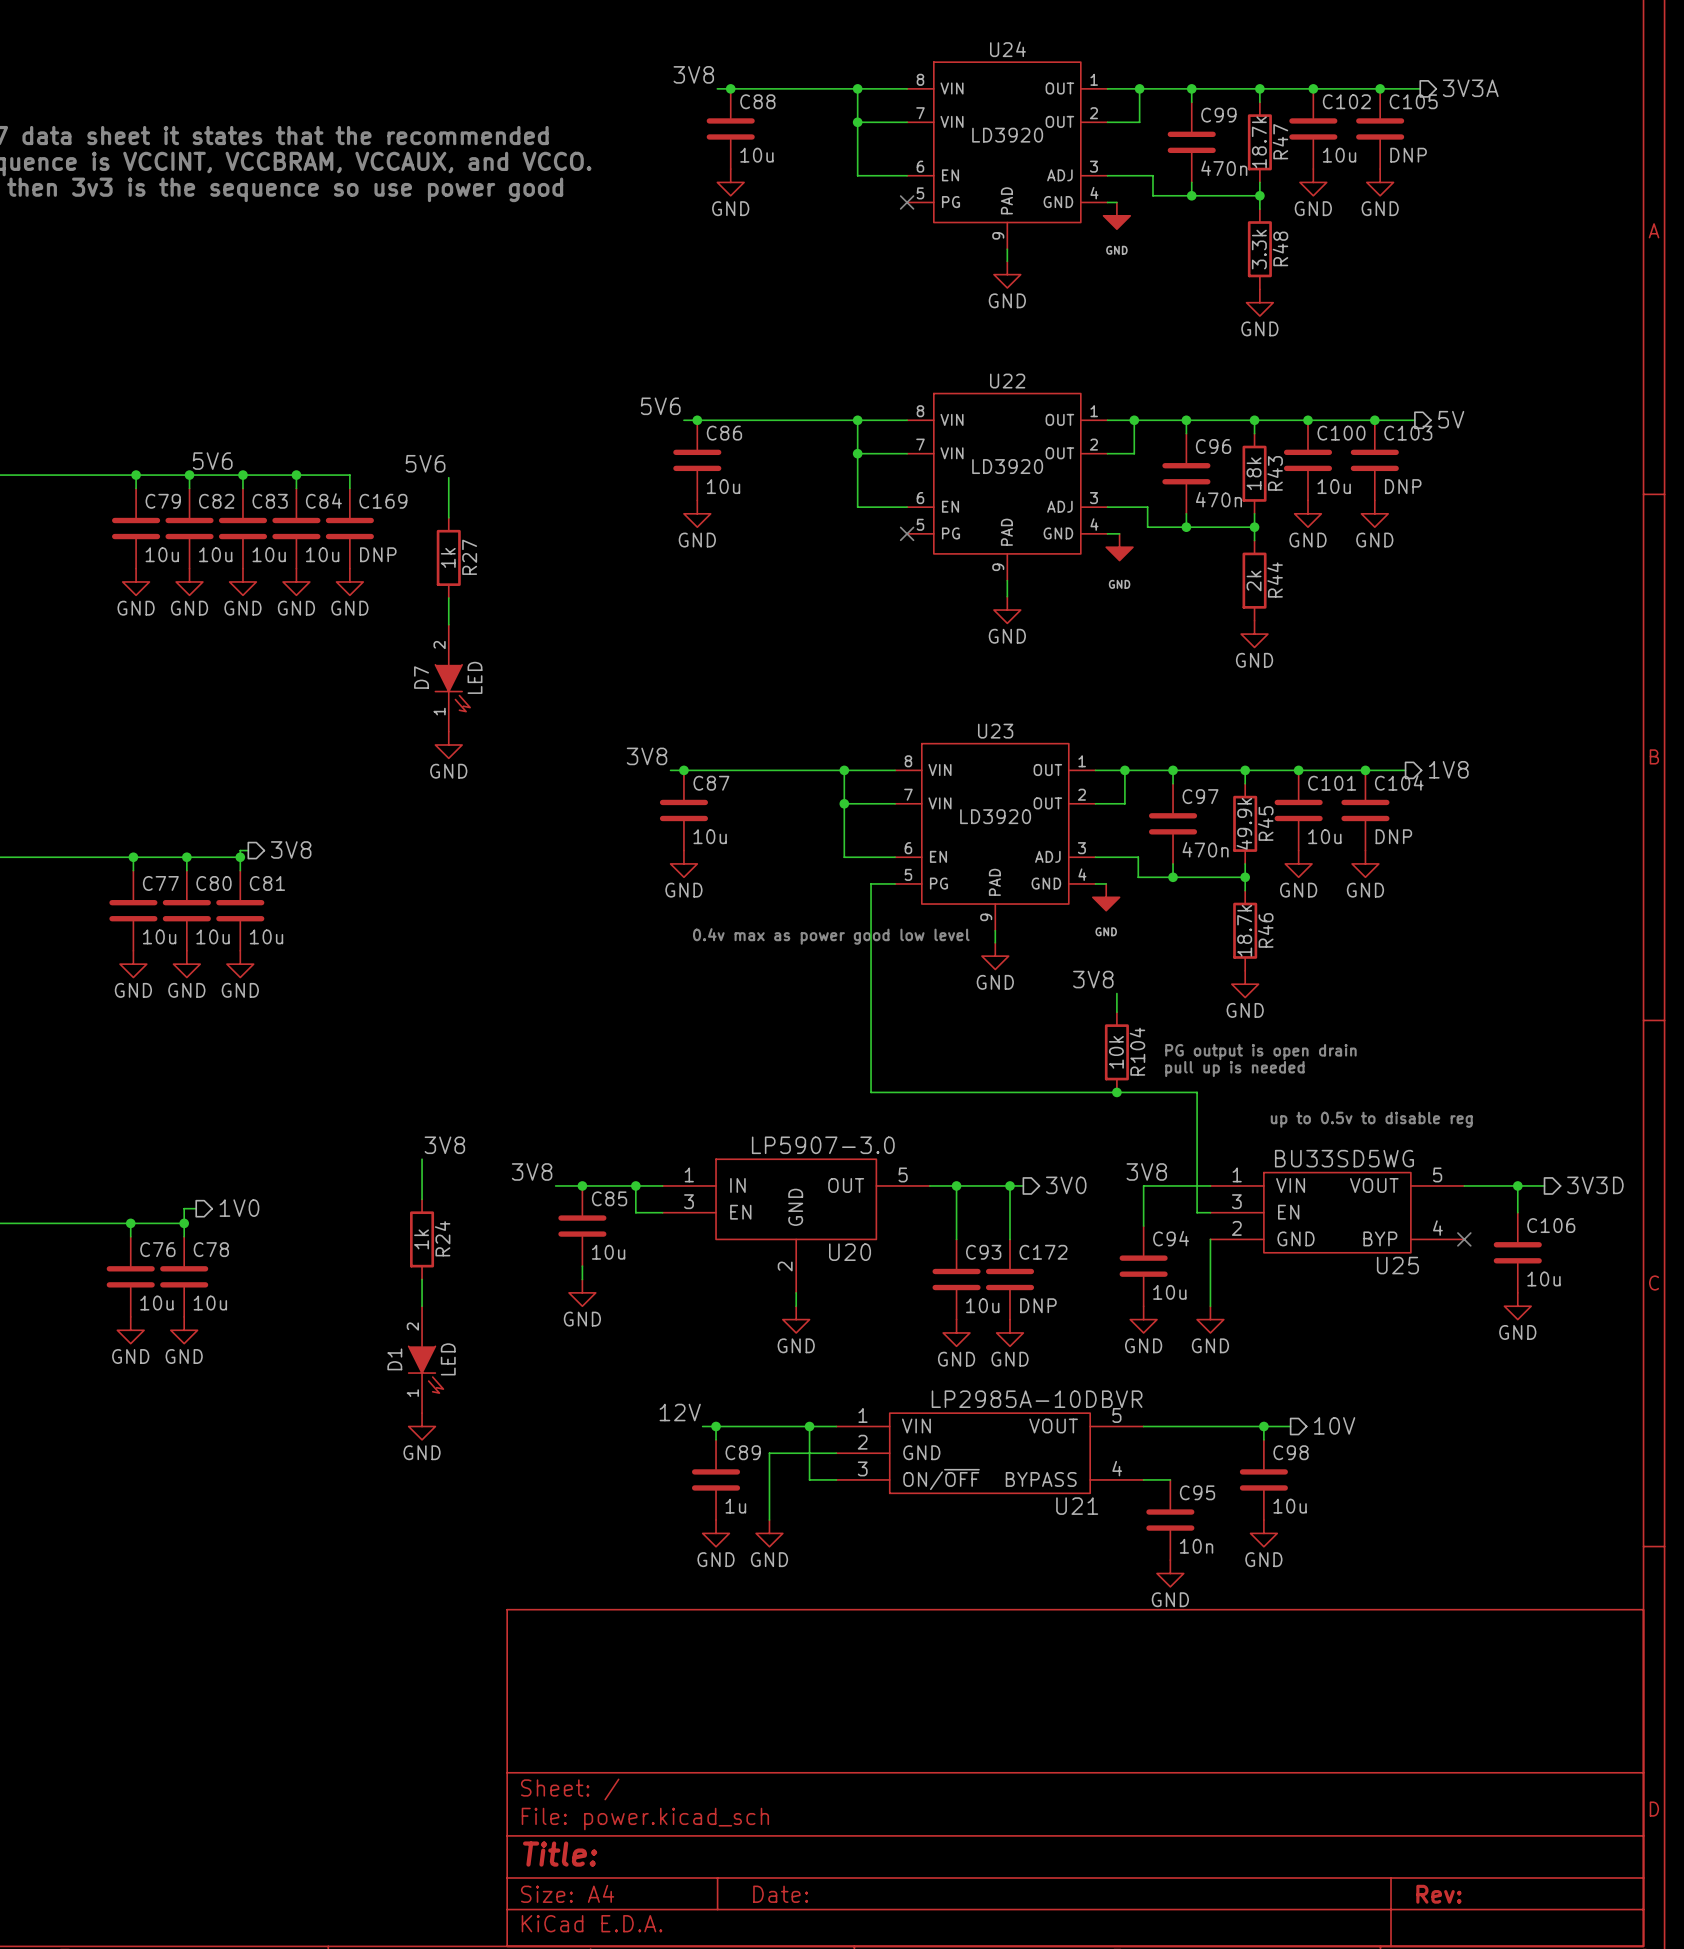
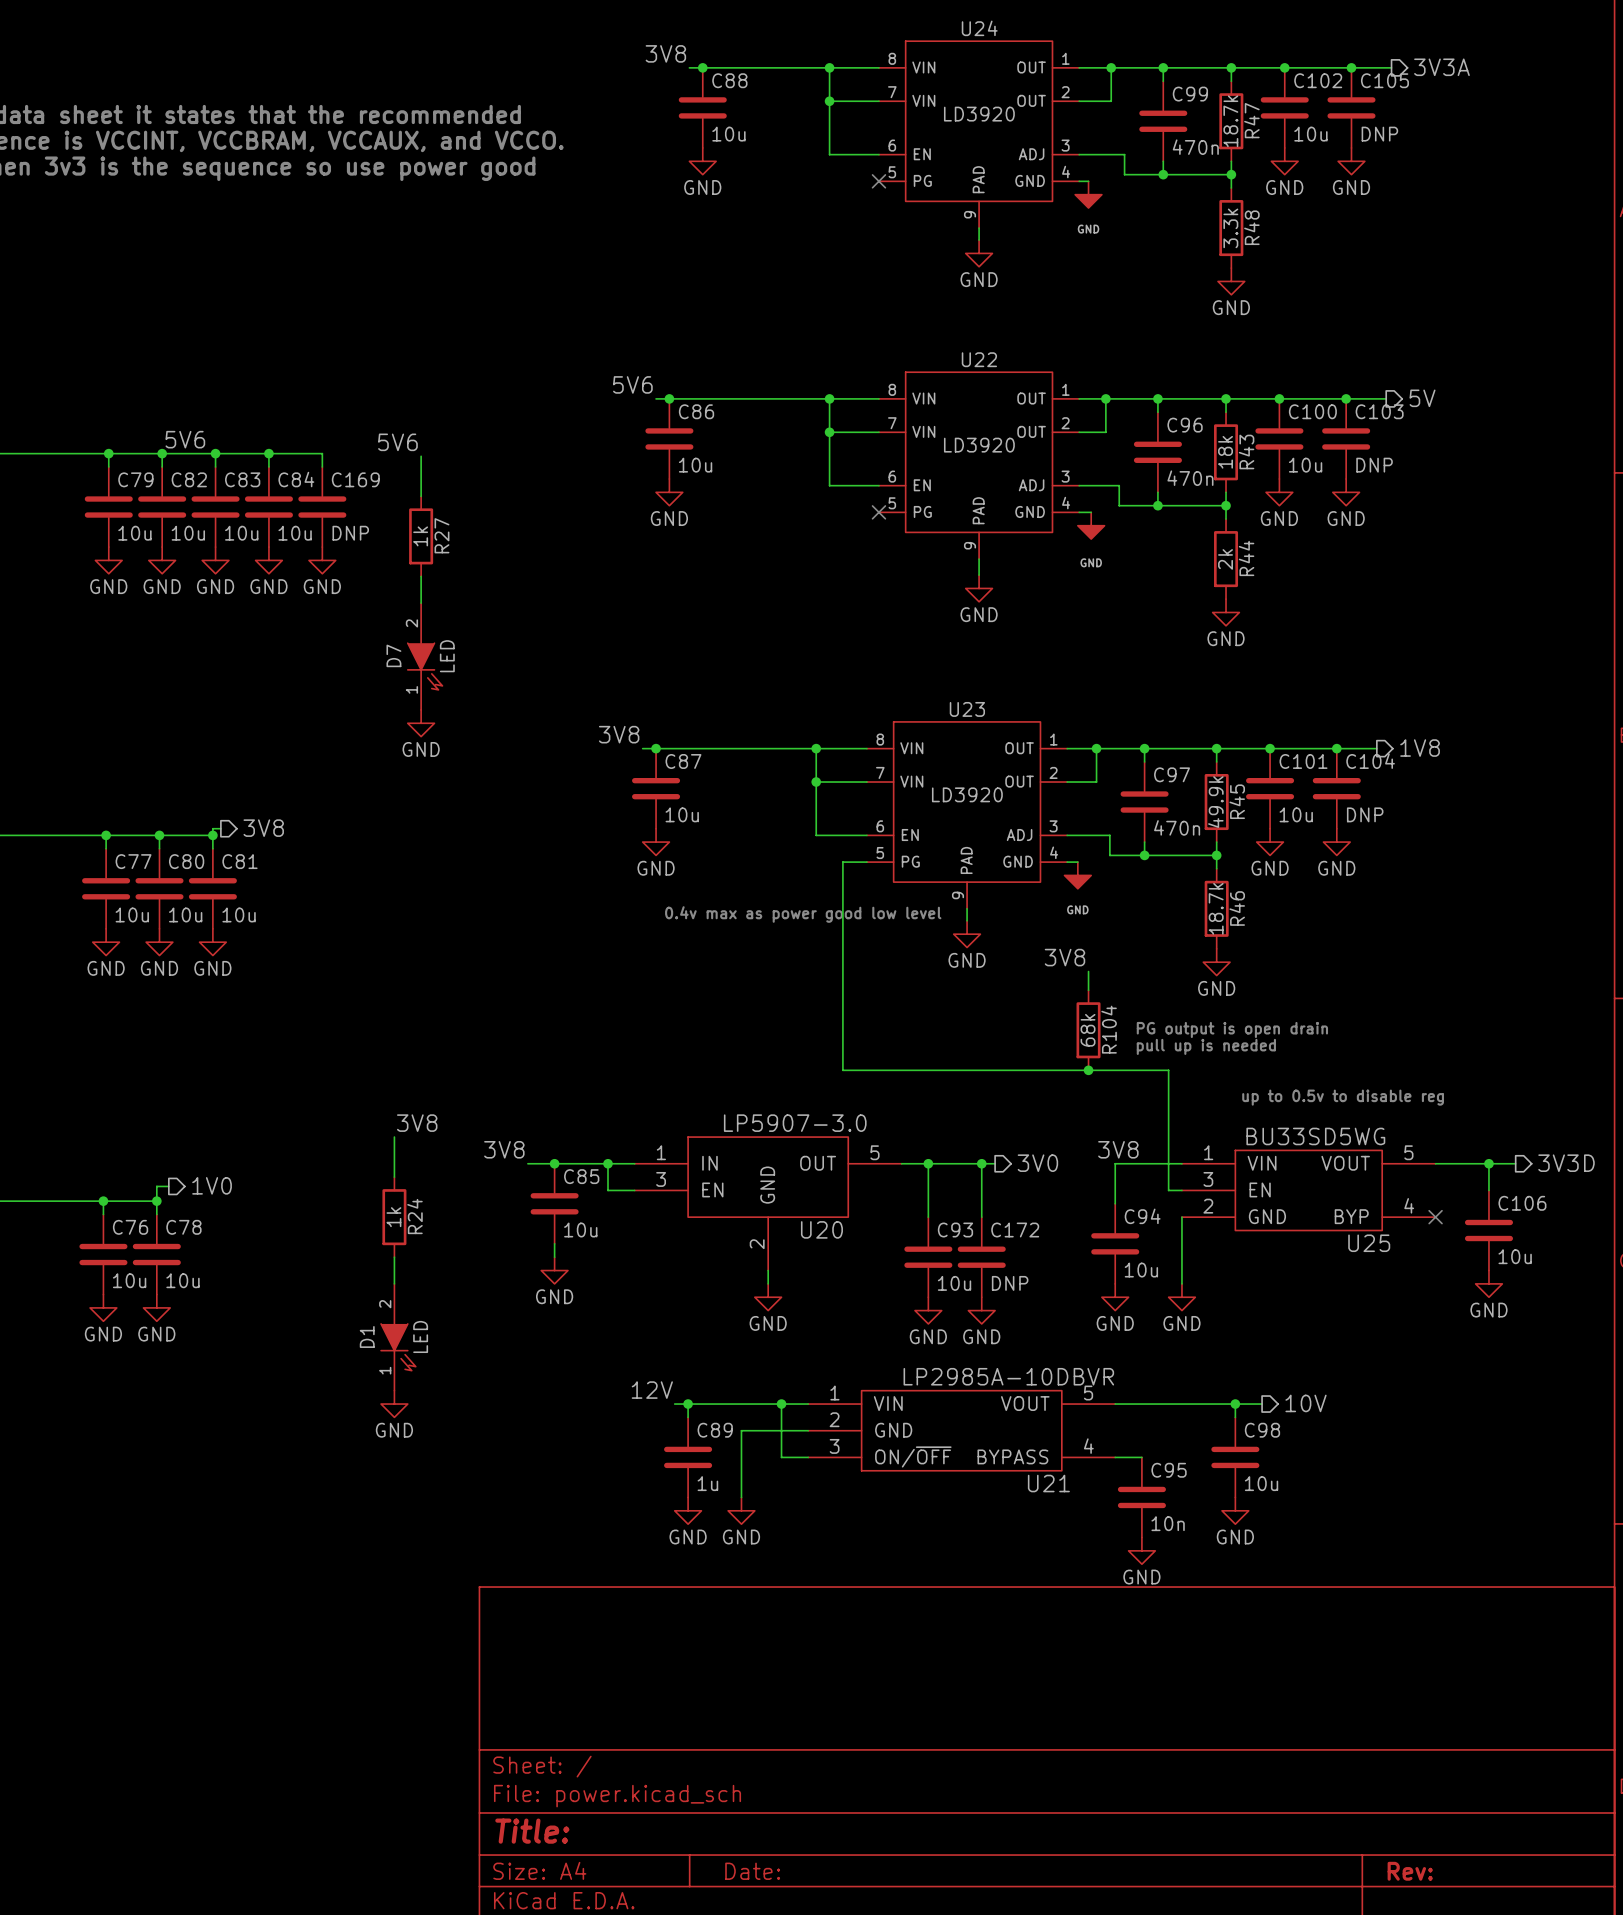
R104 value: 10k (1116, 1052) -> 68k (1088, 1030)

